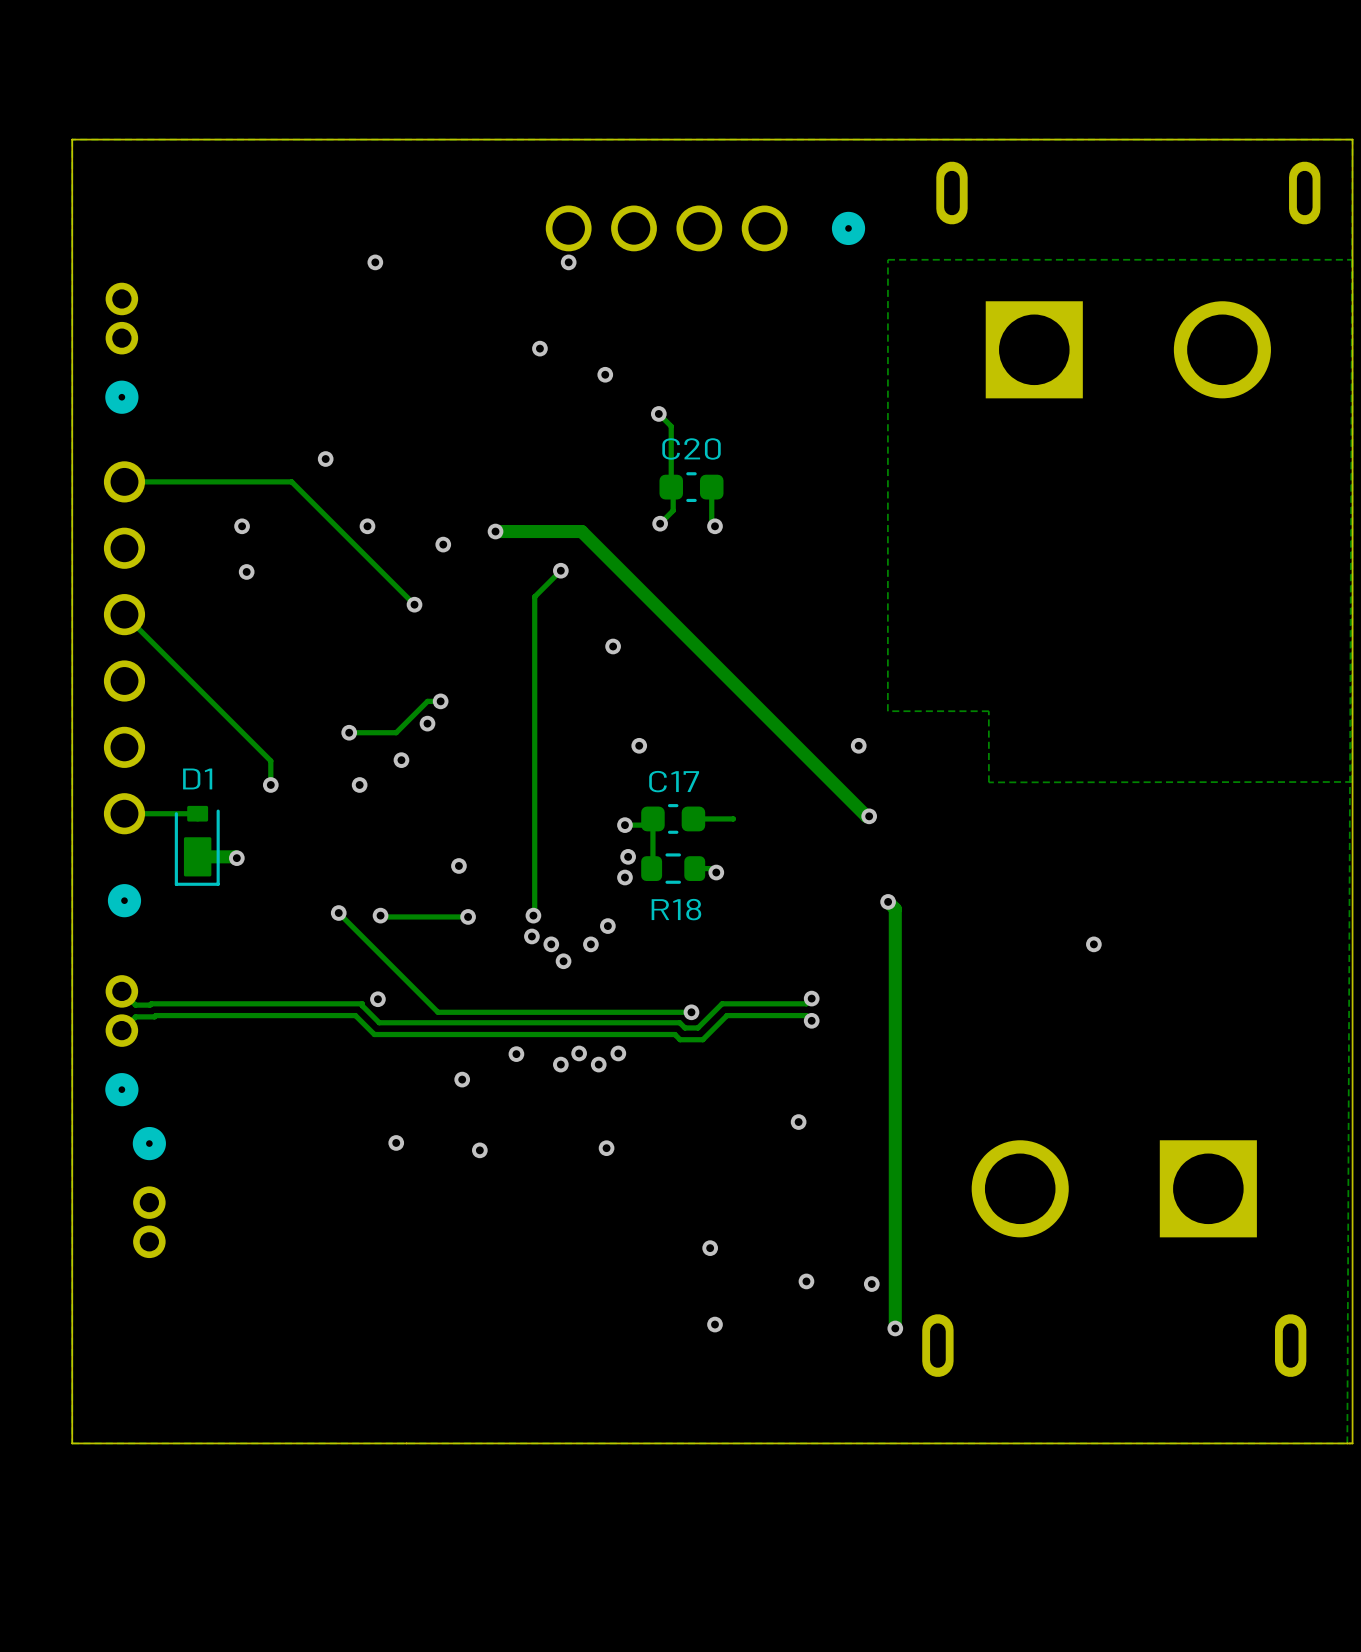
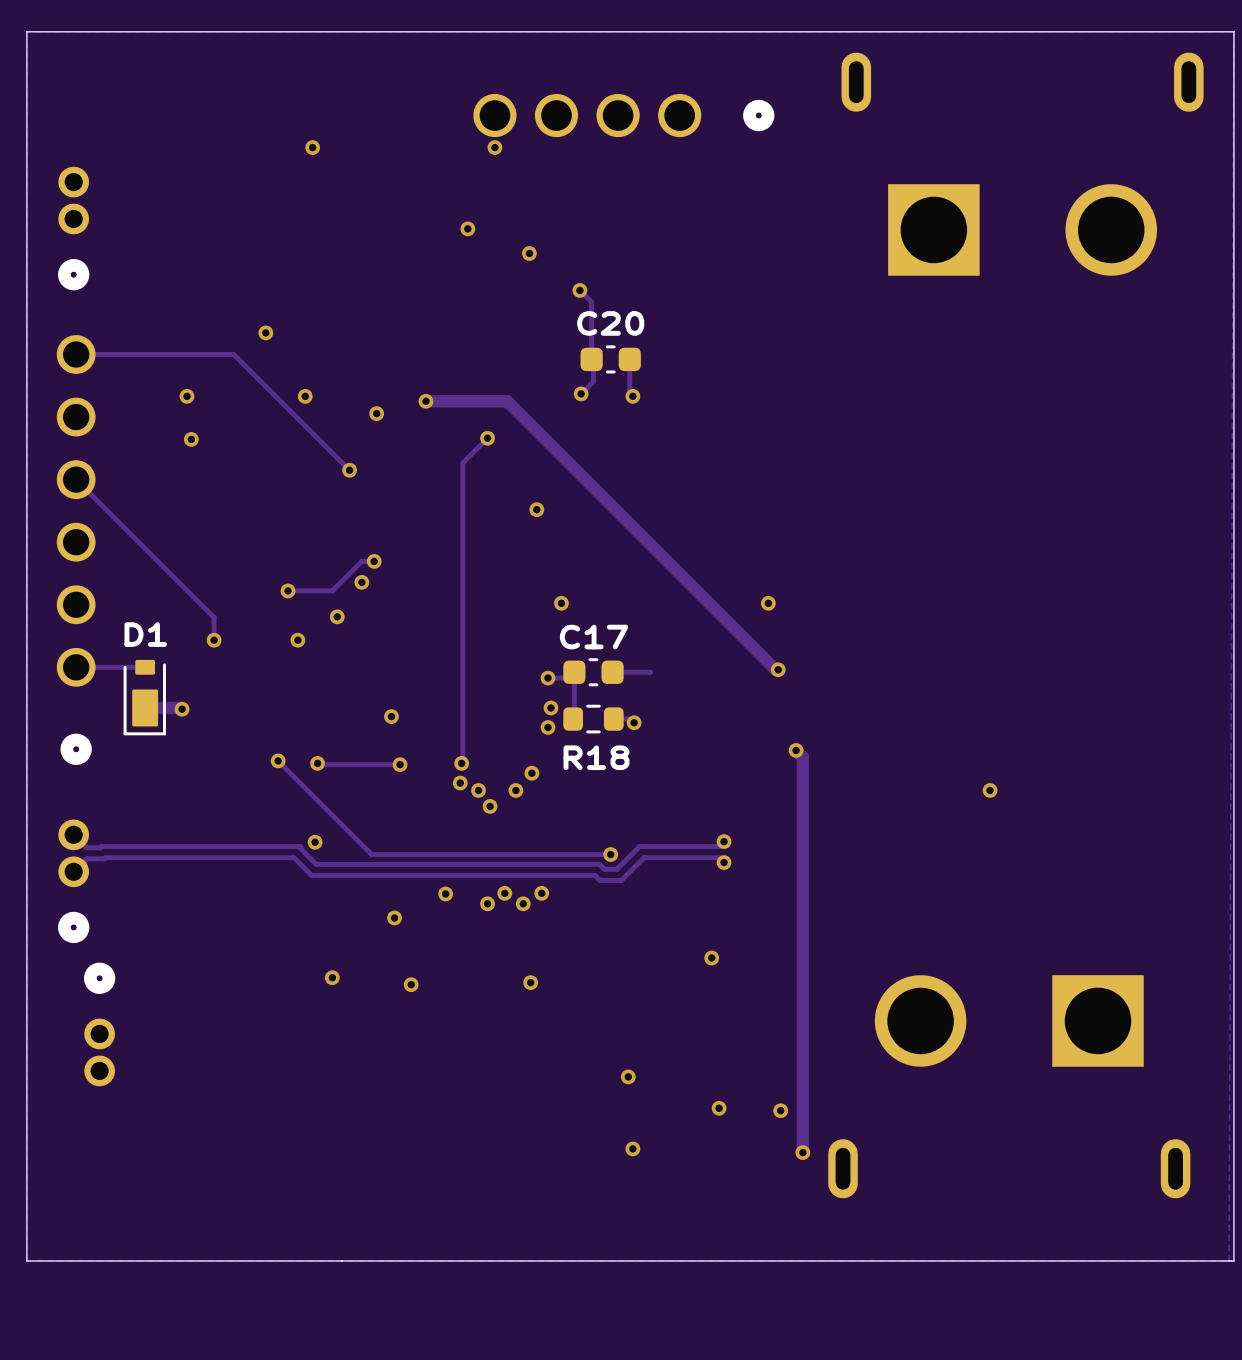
zone outline: (1352, 259) (887, 259) (887, 711) (988, 711) (988, 782) (1352, 781) (1352, 259) -> none

